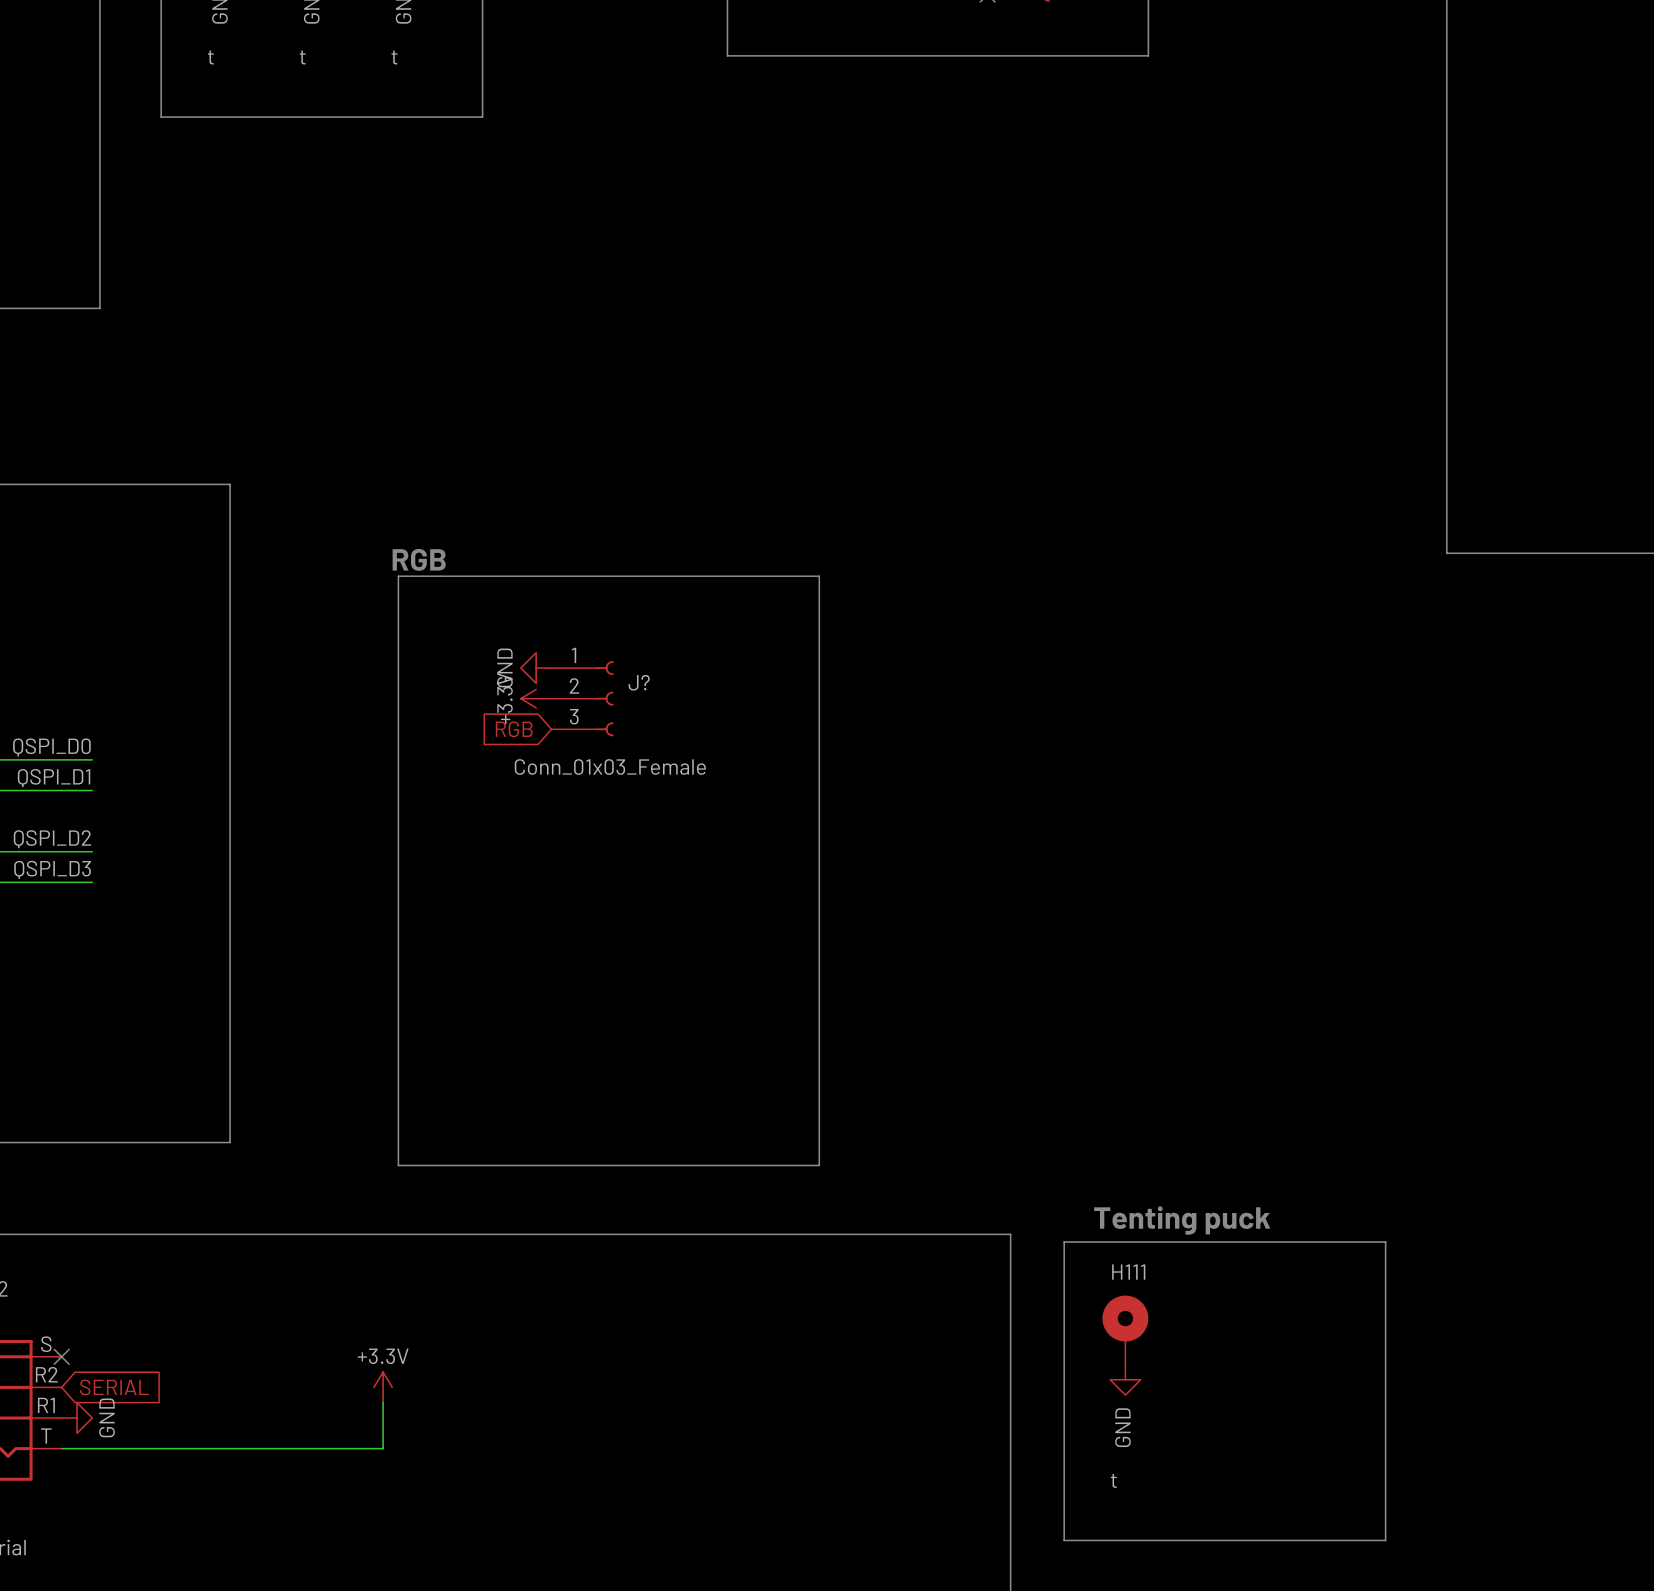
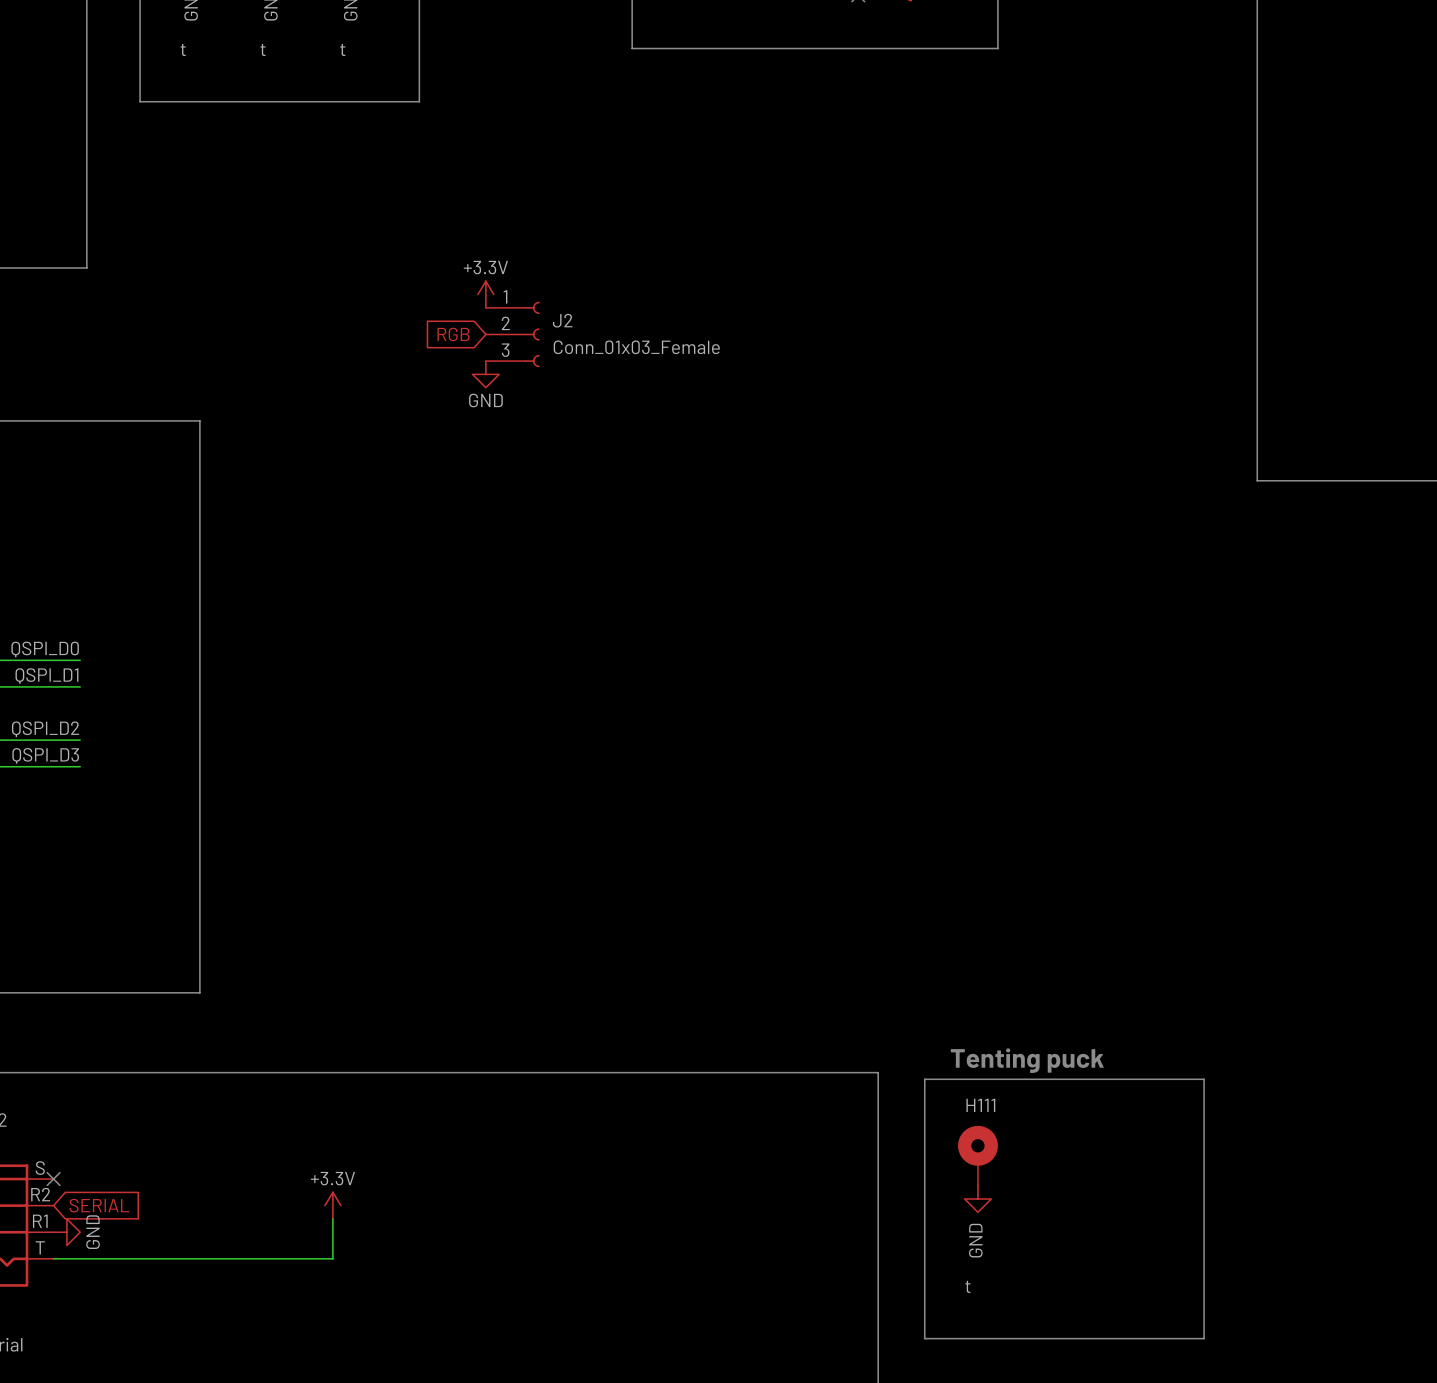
power symbol: none -> +3.3V (485, 294)
global label: none -> RGB (453, 334)
J2: none -> Conn_01x03_Female (512, 334)
text: RGB (419, 559) -> none
line: (398, 576) (819, 576) (819, 1165) (398, 1165) (398, 576) -> none
power symbol rotation: 0° (536, 668) -> 90° counterclockwise (485, 374)
power symbol position: GND (536, 668) -> GND (485, 374)
power symbol: +3.3V (536, 698) -> none
J?: Conn_01x03_Female (582, 698) -> none
global label: RGB (514, 729) -> none

